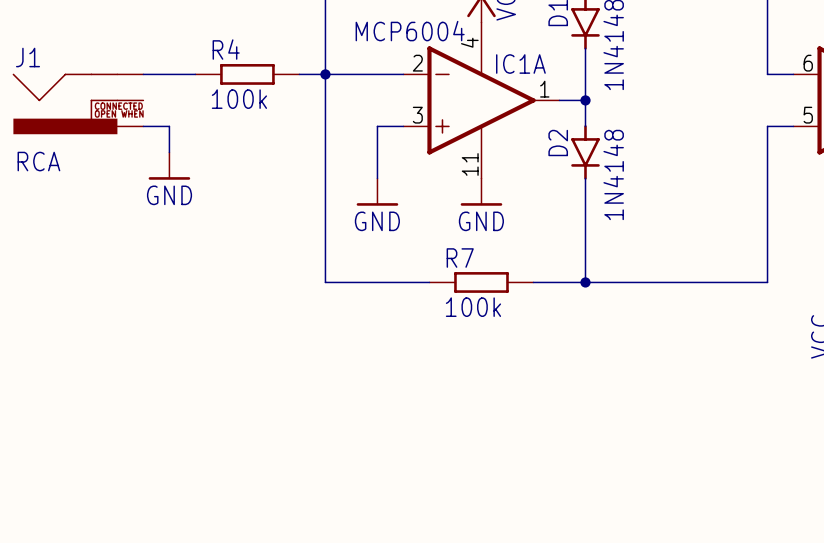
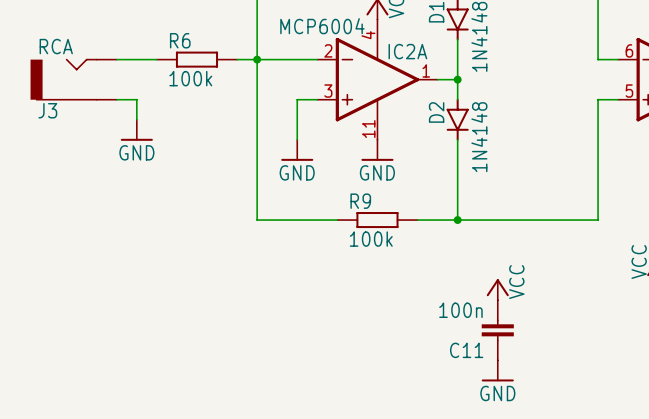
R4 name: R4 (226, 49) -> R6 (180, 40)
IC1A name: IC1A (520, 64) -> IC2A (407, 51)
J3: none -> RCA (73, 79)
J1: RCA (78, 103) -> none
R7 name: R7 (460, 258) -> R9 (360, 201)
power symbol: none -> VCC (497, 289)
C11: none -> 100n (497, 330)
power symbol: none -> GND (497, 370)

